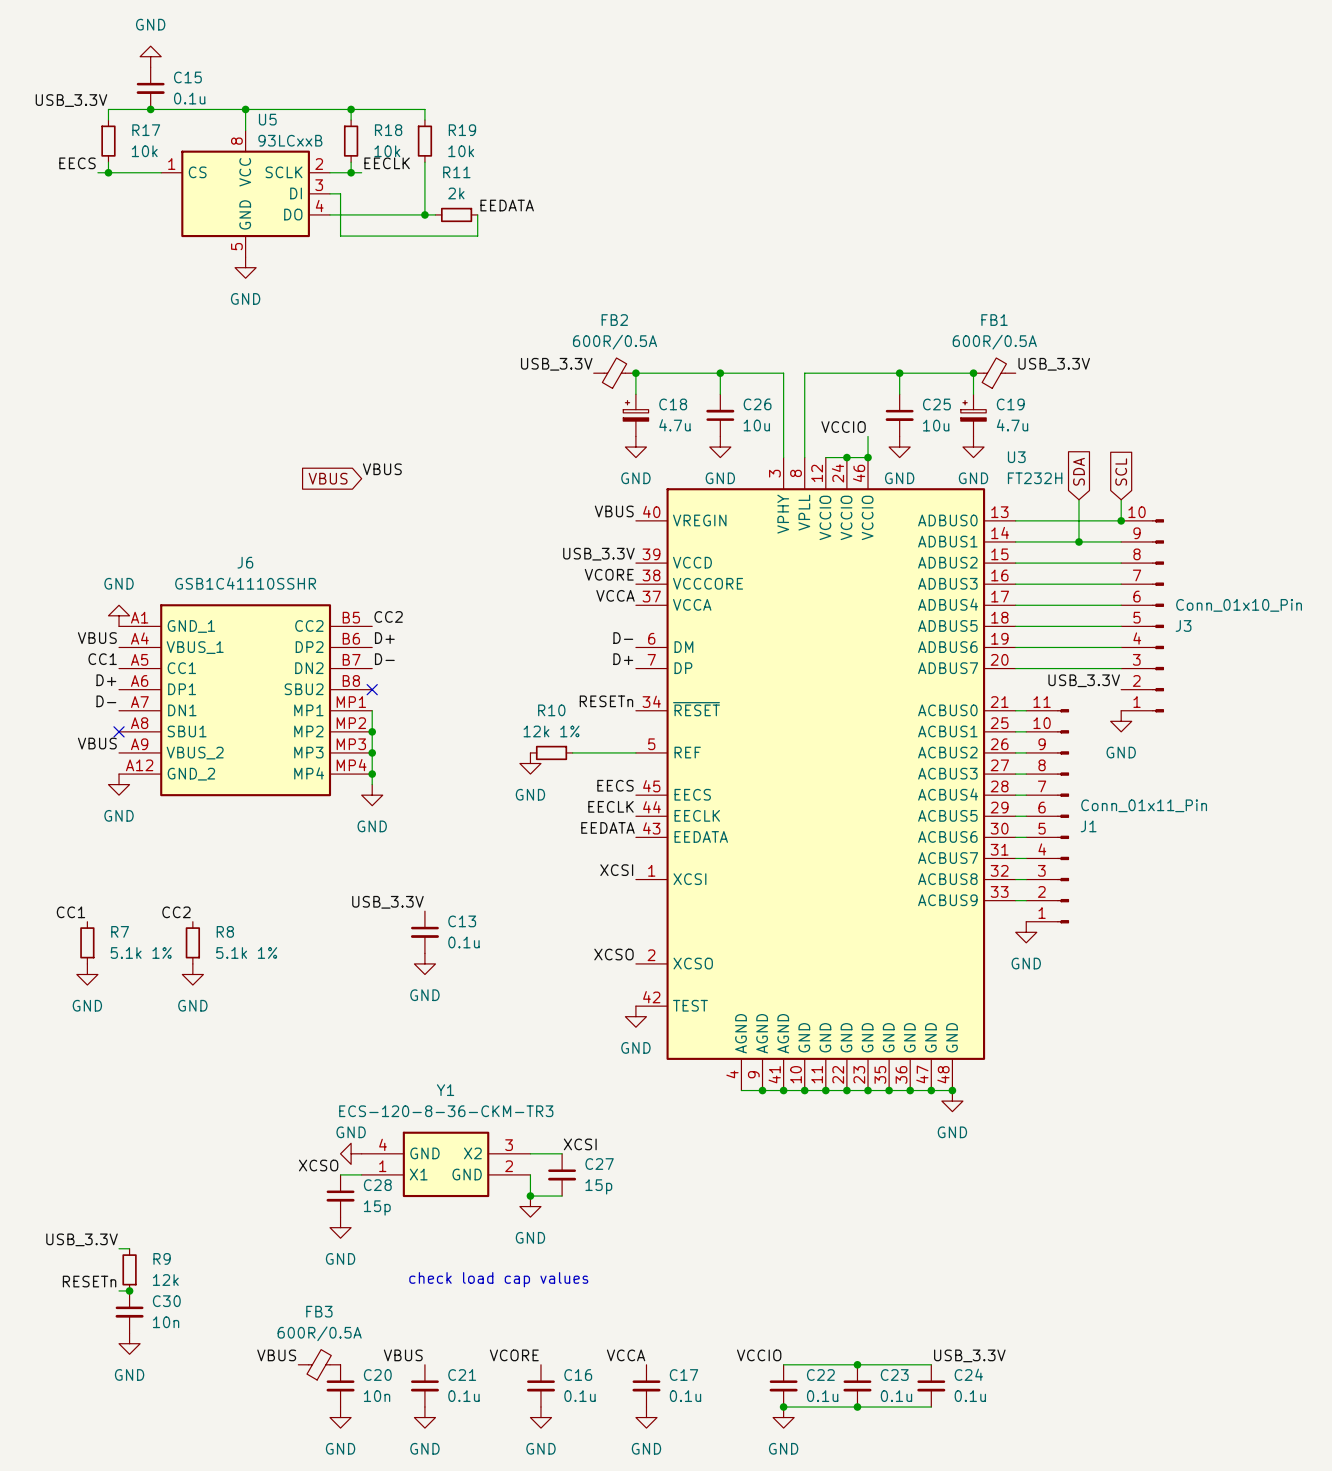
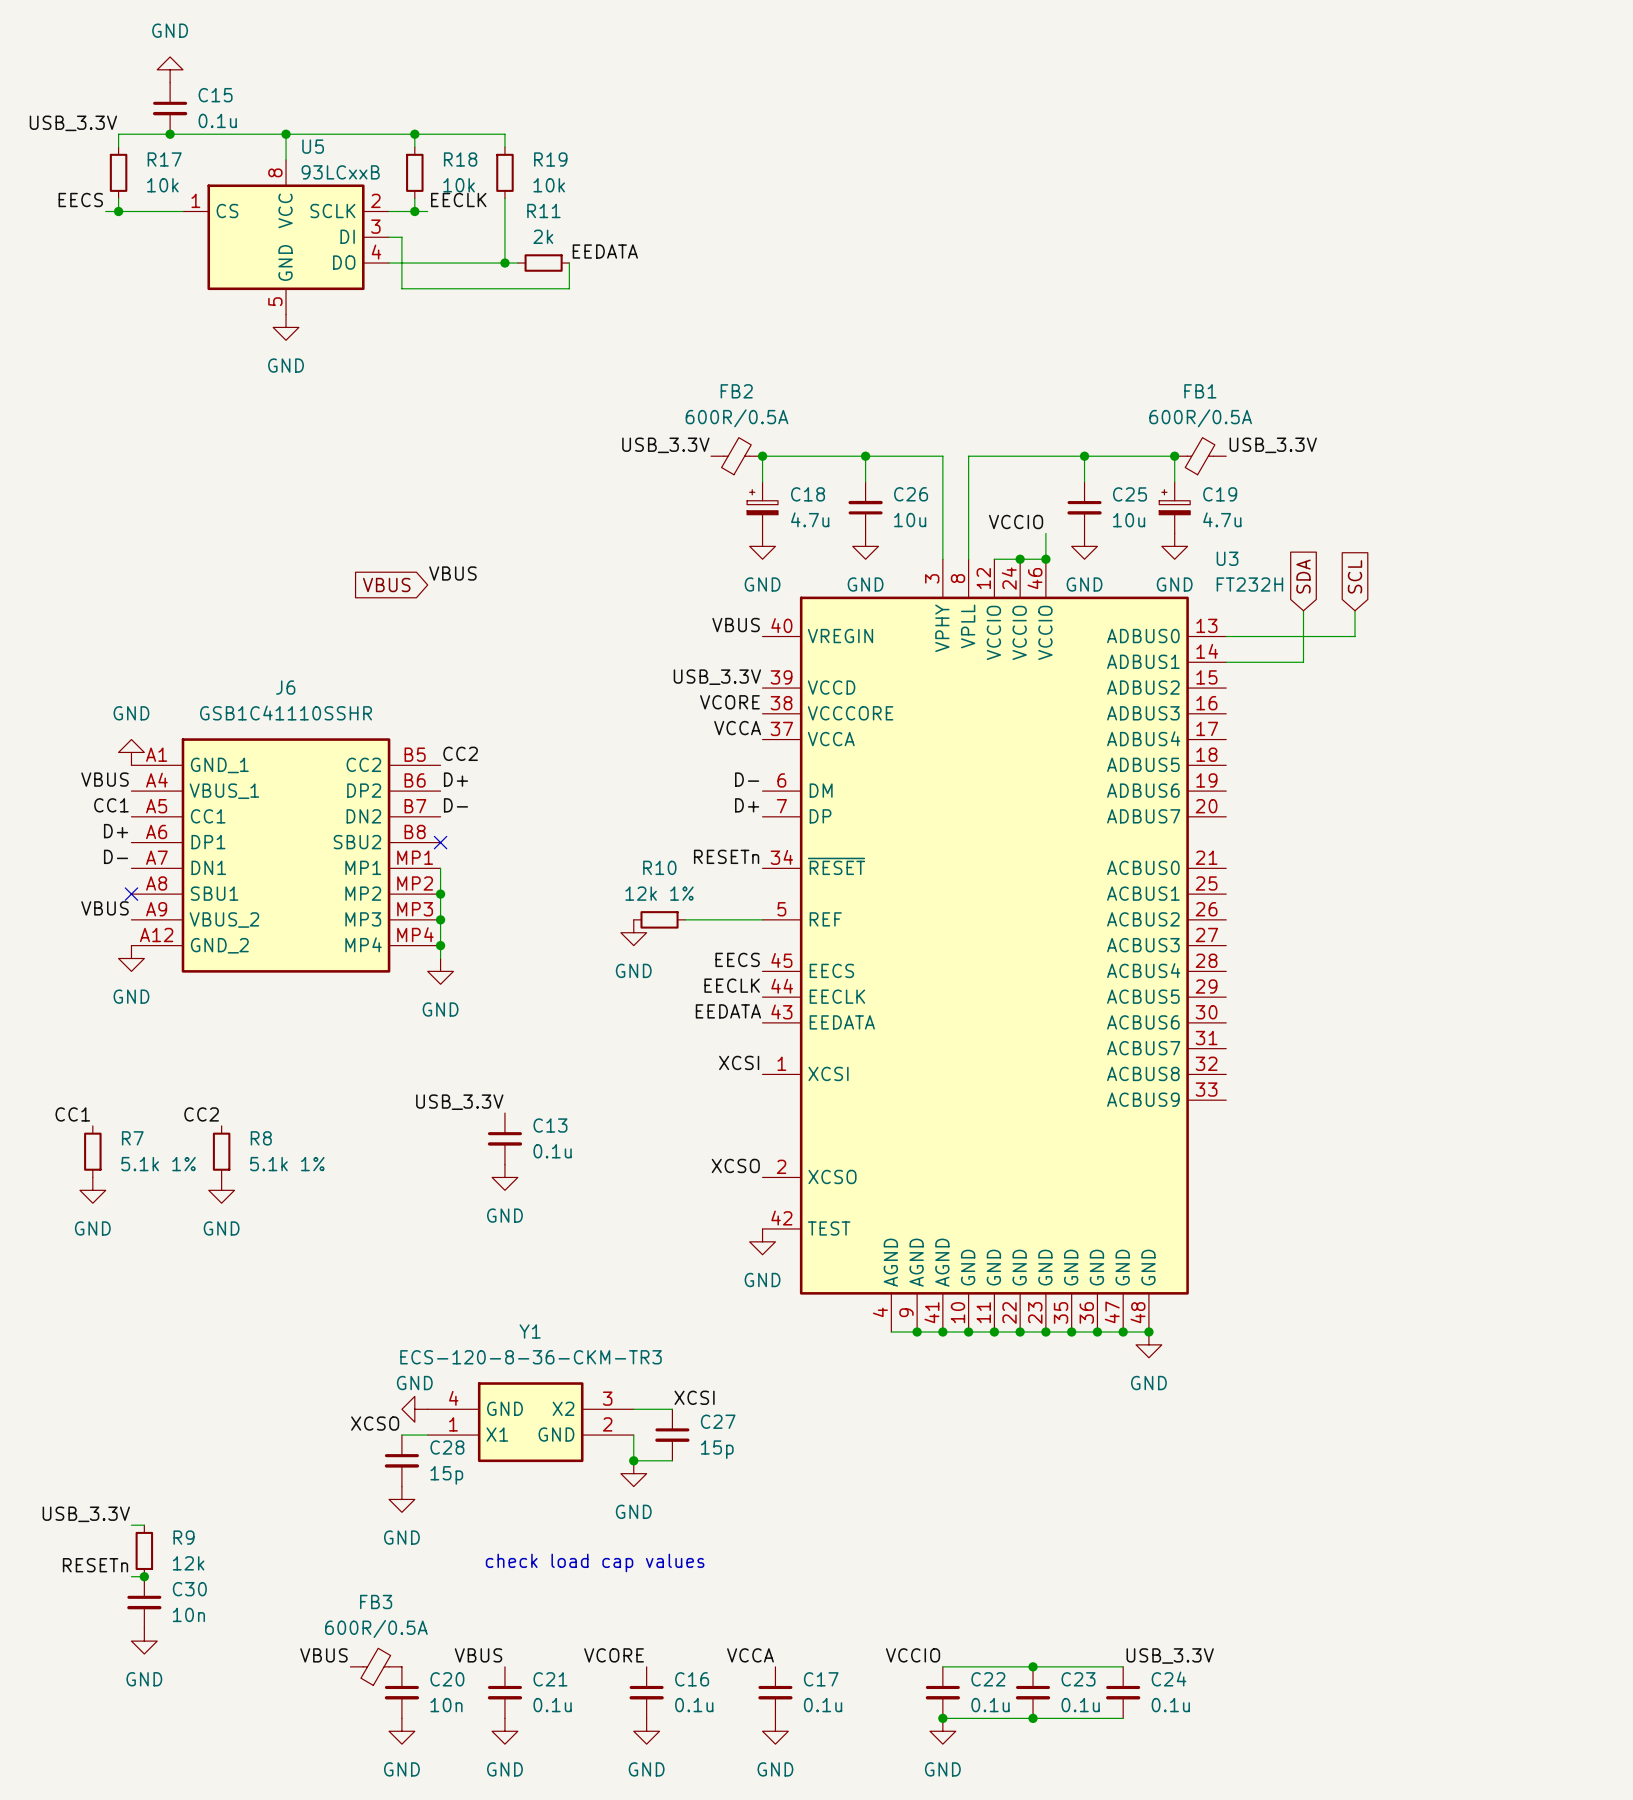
junction: (1121, 520) -> none
wire: (1078, 541) (1121, 541) -> none
junction: (1078, 541) -> none
wire: (1015, 563) (1121, 563) -> none
wire: (1015, 584) (1121, 584) -> none
wire: (1015, 605) (1121, 605) -> none
J3: Conn_01x10_Pin (1142, 615) -> none
wire: (1015, 626) (1121, 626) -> none
wire: (1015, 647) (1121, 647) -> none
wire: (1015, 668) (1121, 668) -> none
label: USB_3.3V (1084, 680) -> none
wire: (1015, 710) (1026, 710) -> none
power symbol: GND (1121, 721) -> none
wire: (1015, 731) (1026, 731) -> none
wire: (1015, 752) (1026, 752) -> none
wire: (1015, 774) (1026, 774) -> none
wire: (1015, 795) (1026, 795) -> none
wire: (1015, 816) (1026, 816) -> none
J1: Conn_01x11_Pin (1047, 816) -> none
wire: (1015, 837) (1026, 837) -> none
wire: (1015, 858) (1026, 858) -> none
wire: (1015, 879) (1026, 879) -> none
wire: (1015, 900) (1026, 900) -> none
power symbol: GND (1026, 932) -> none

